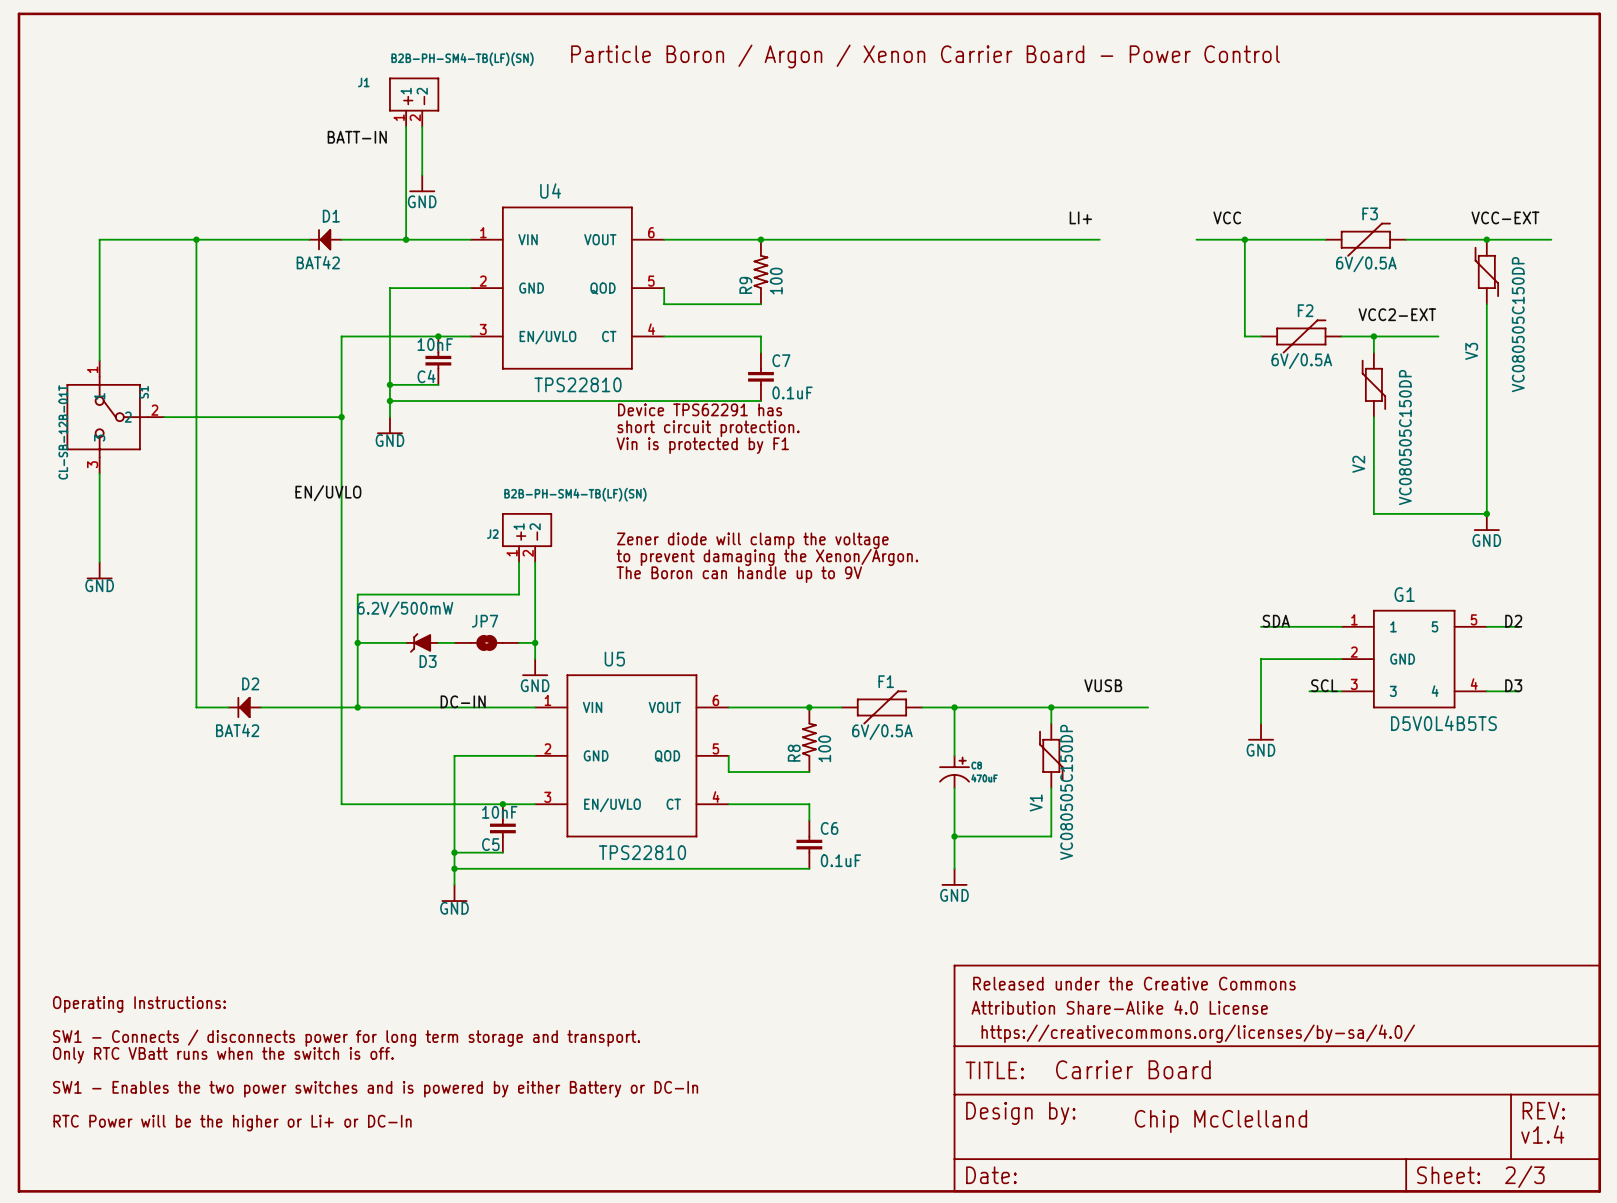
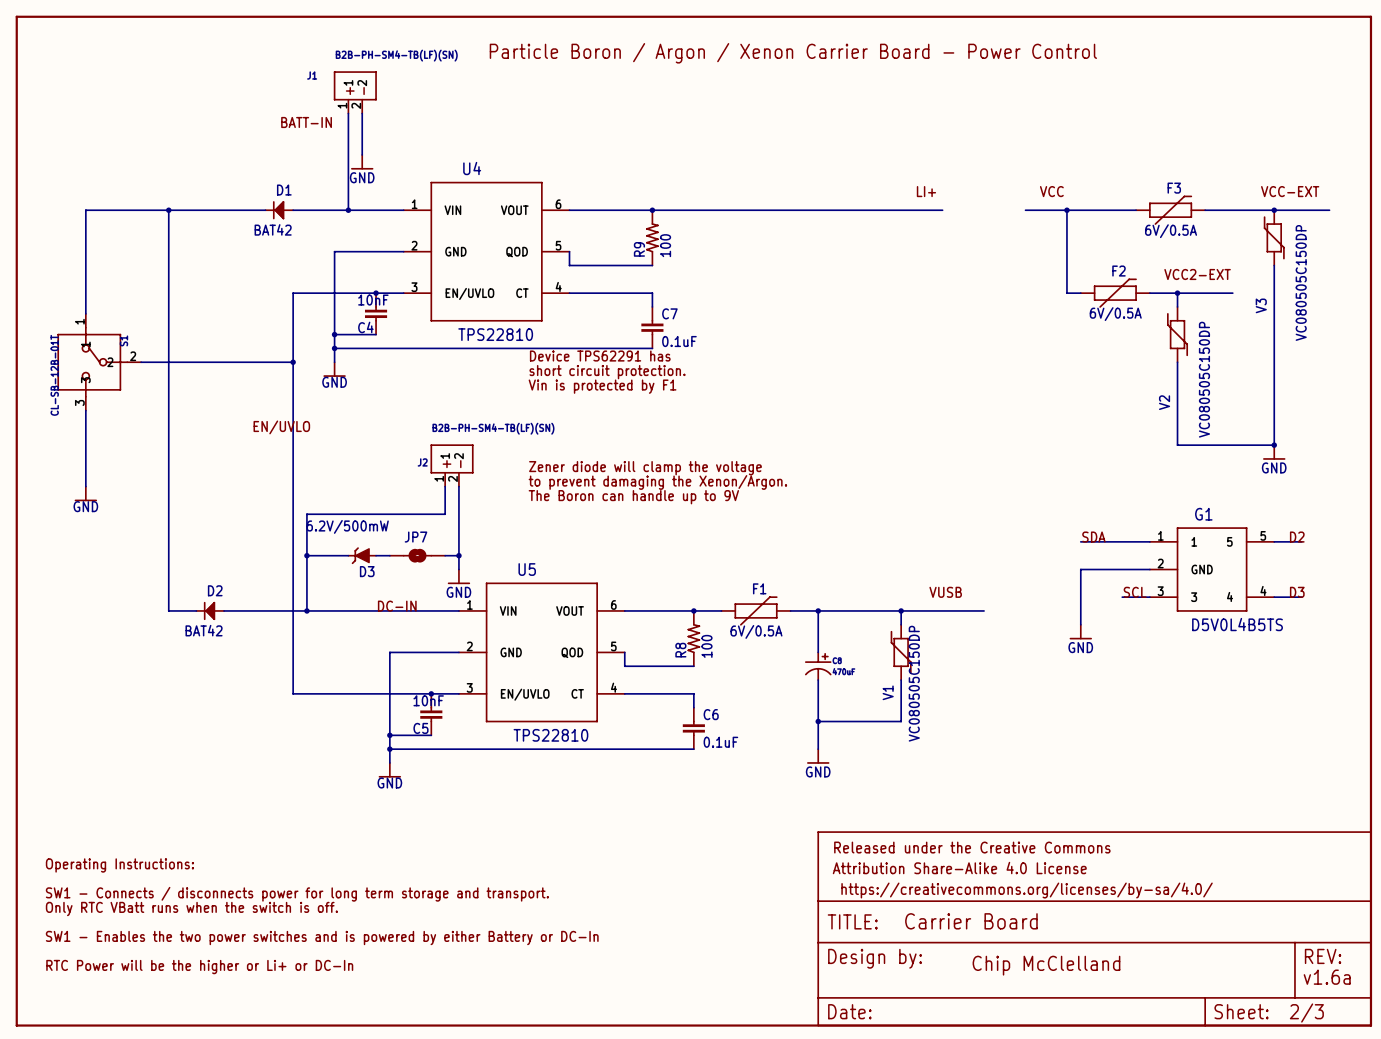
text: v1.4 (1542, 1134) -> v1.6a (1327, 977)

